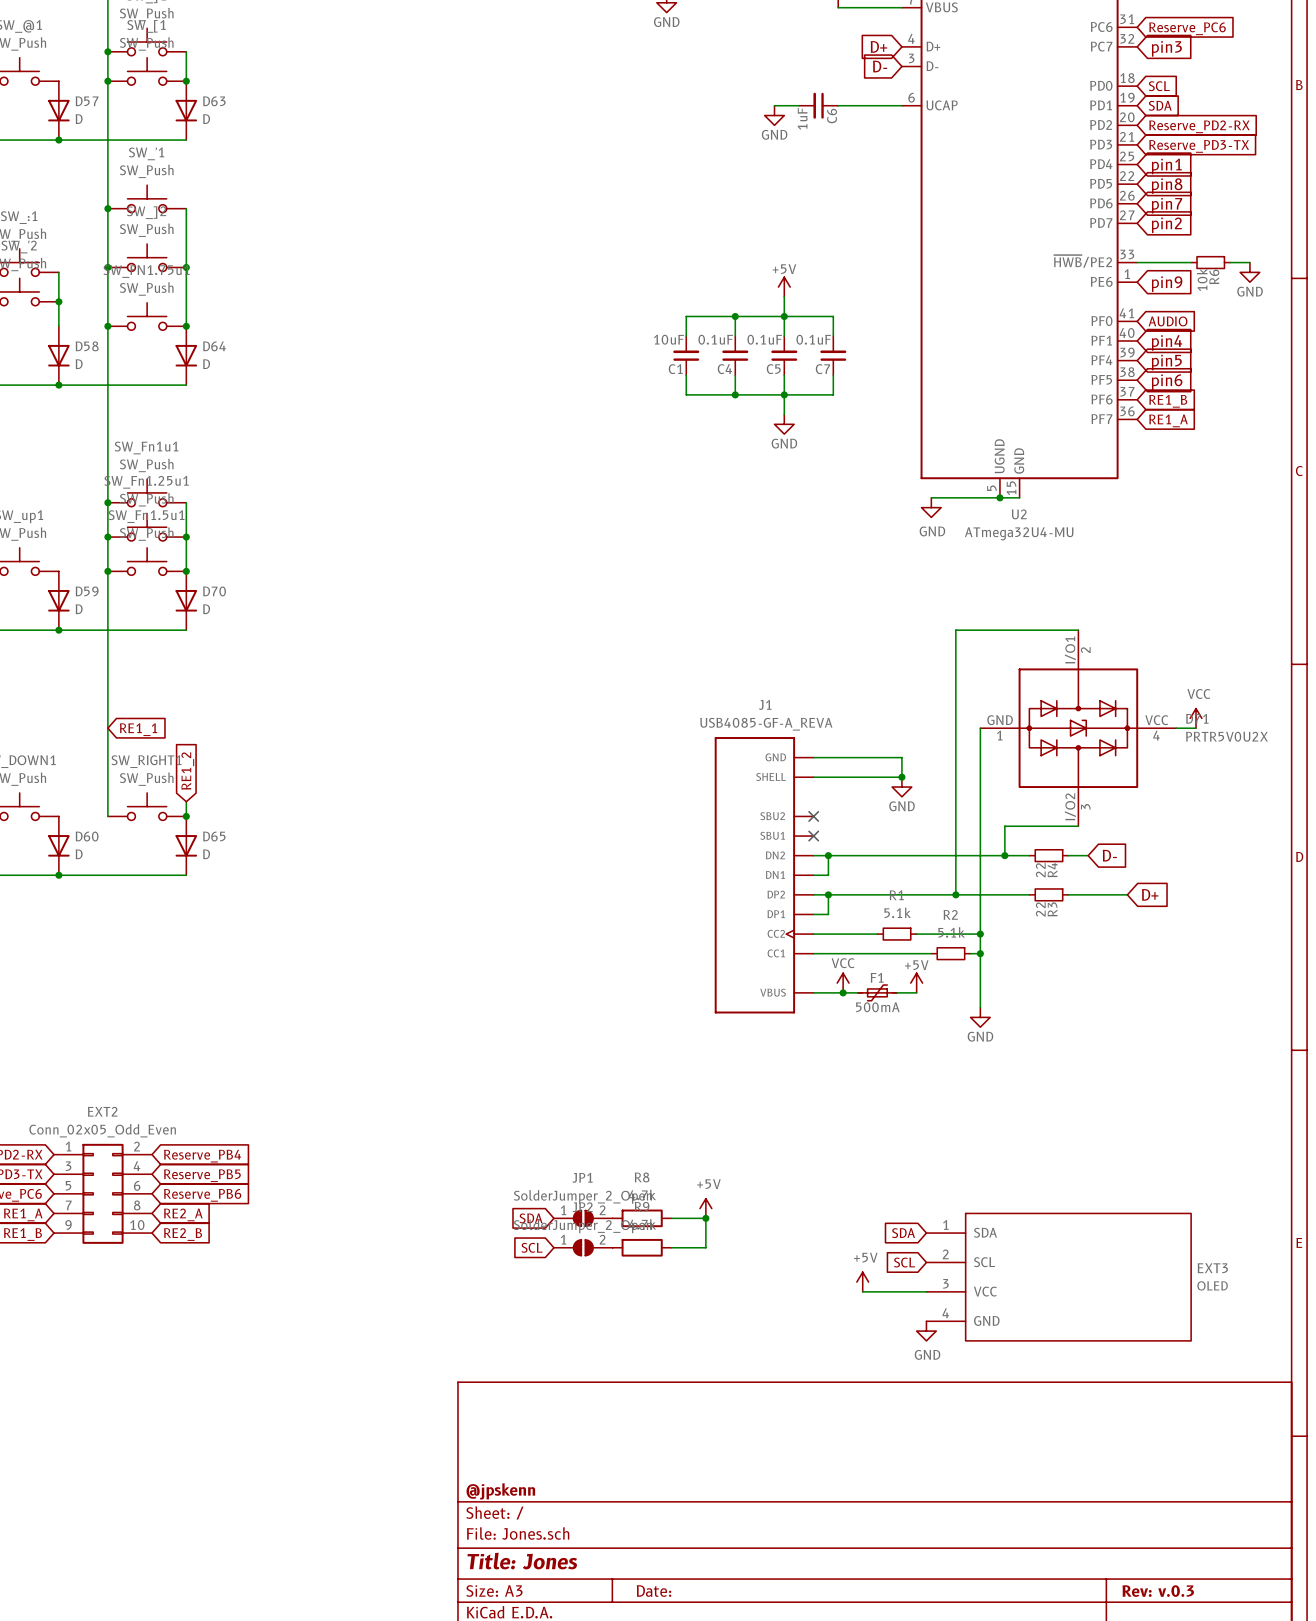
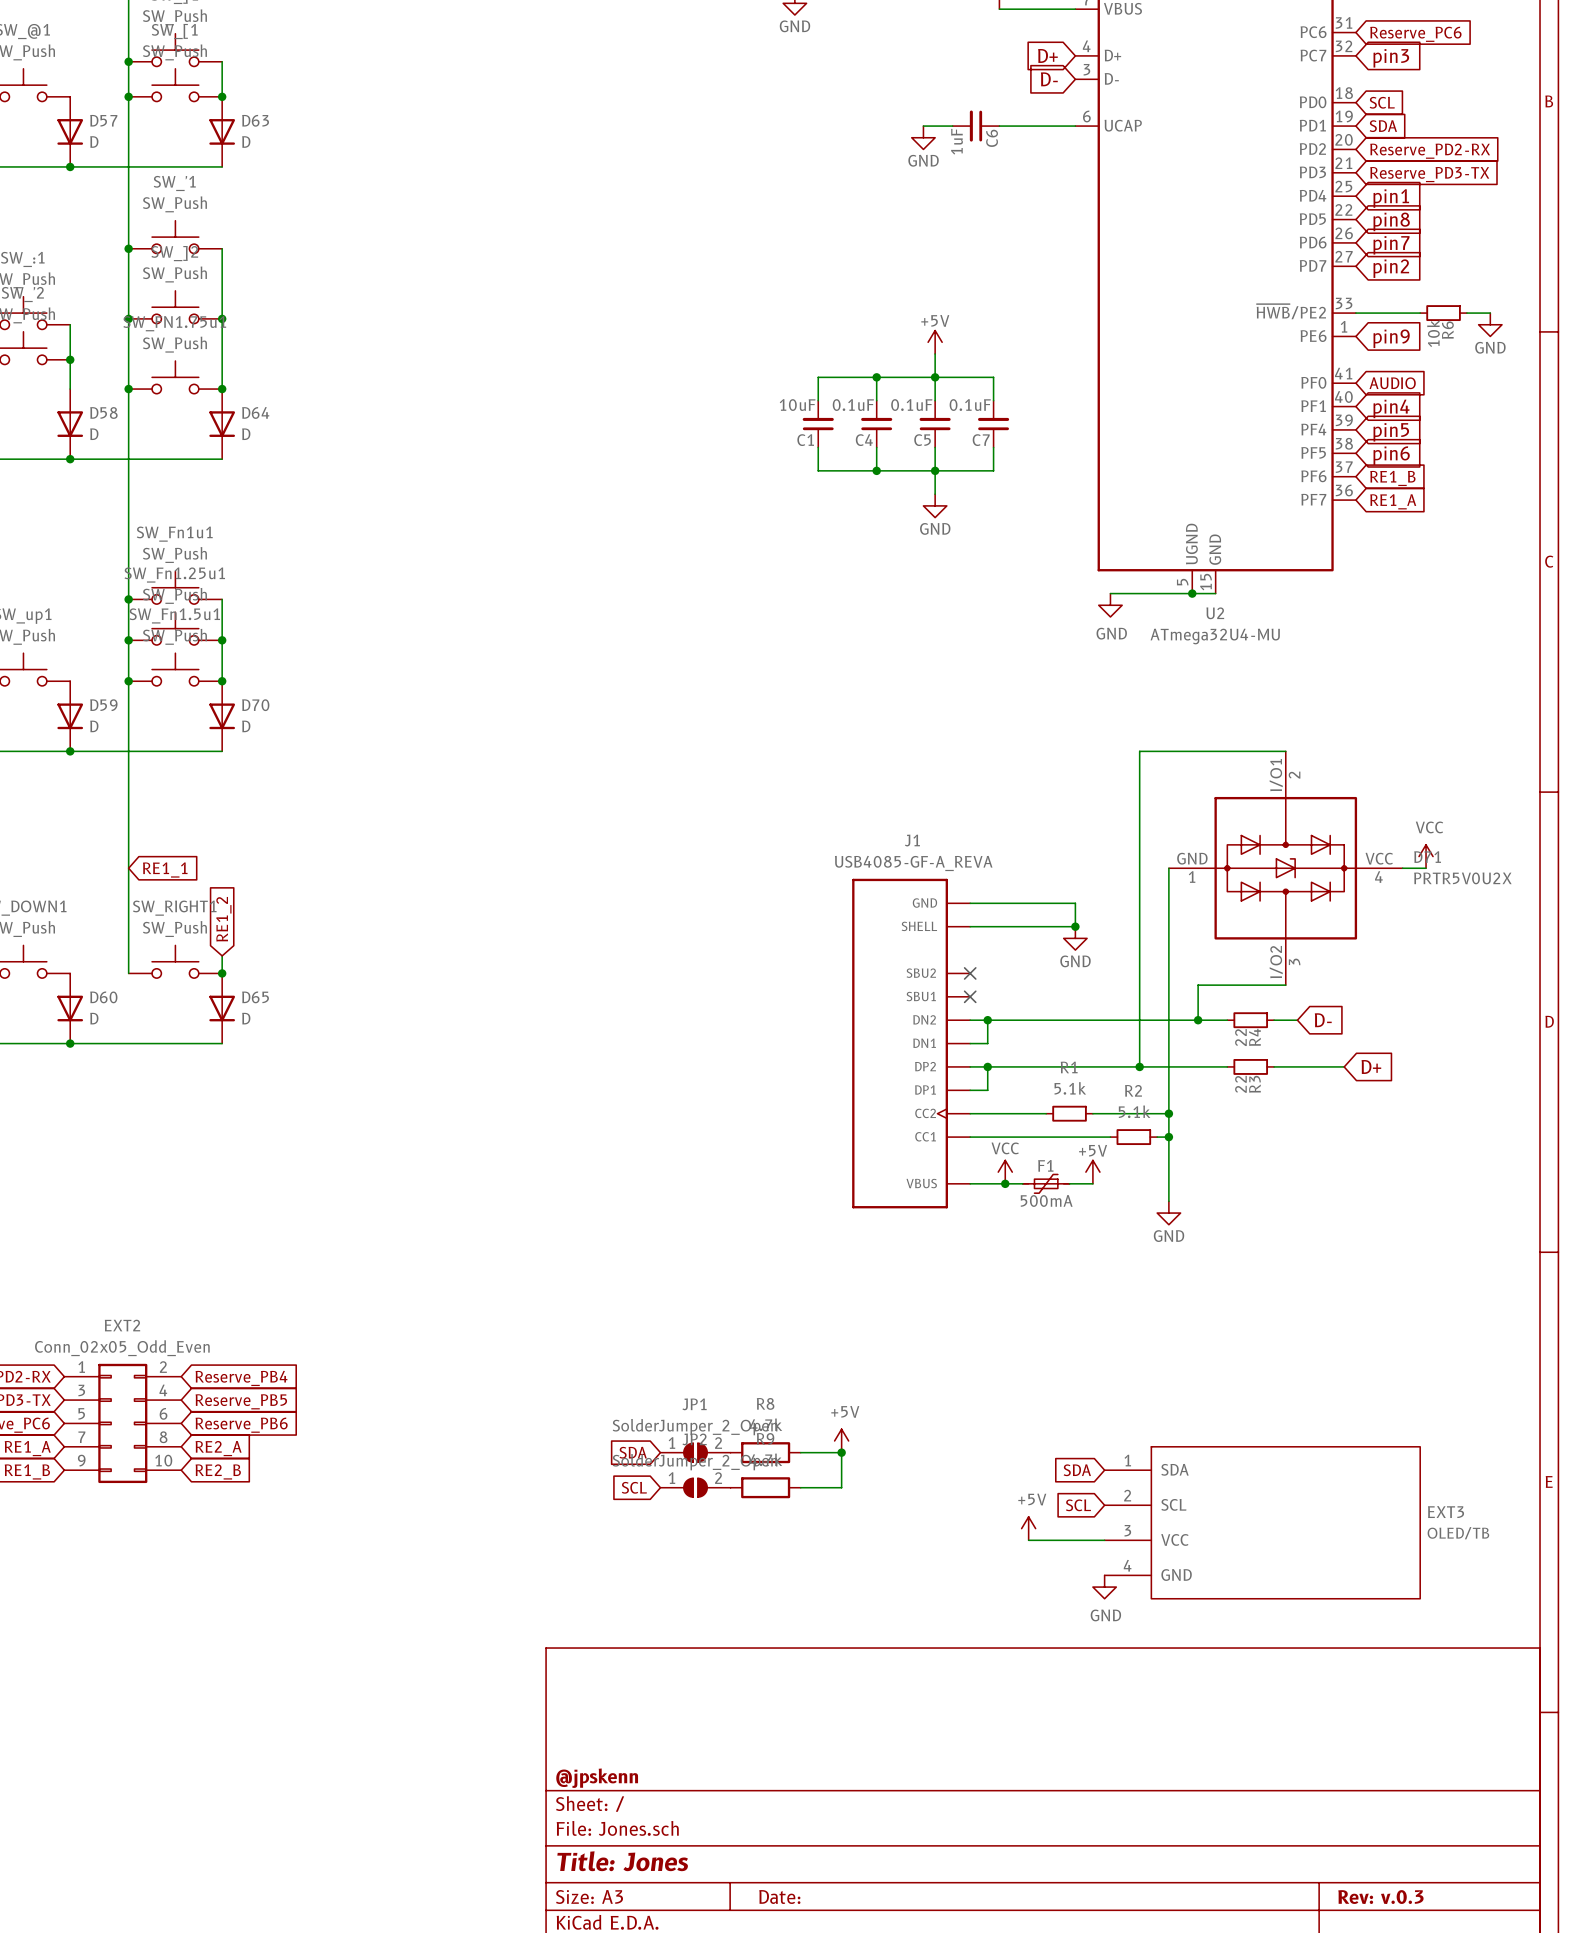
EXT3 value: OLED (1212, 1285) -> OLED/TB (1458, 1533)

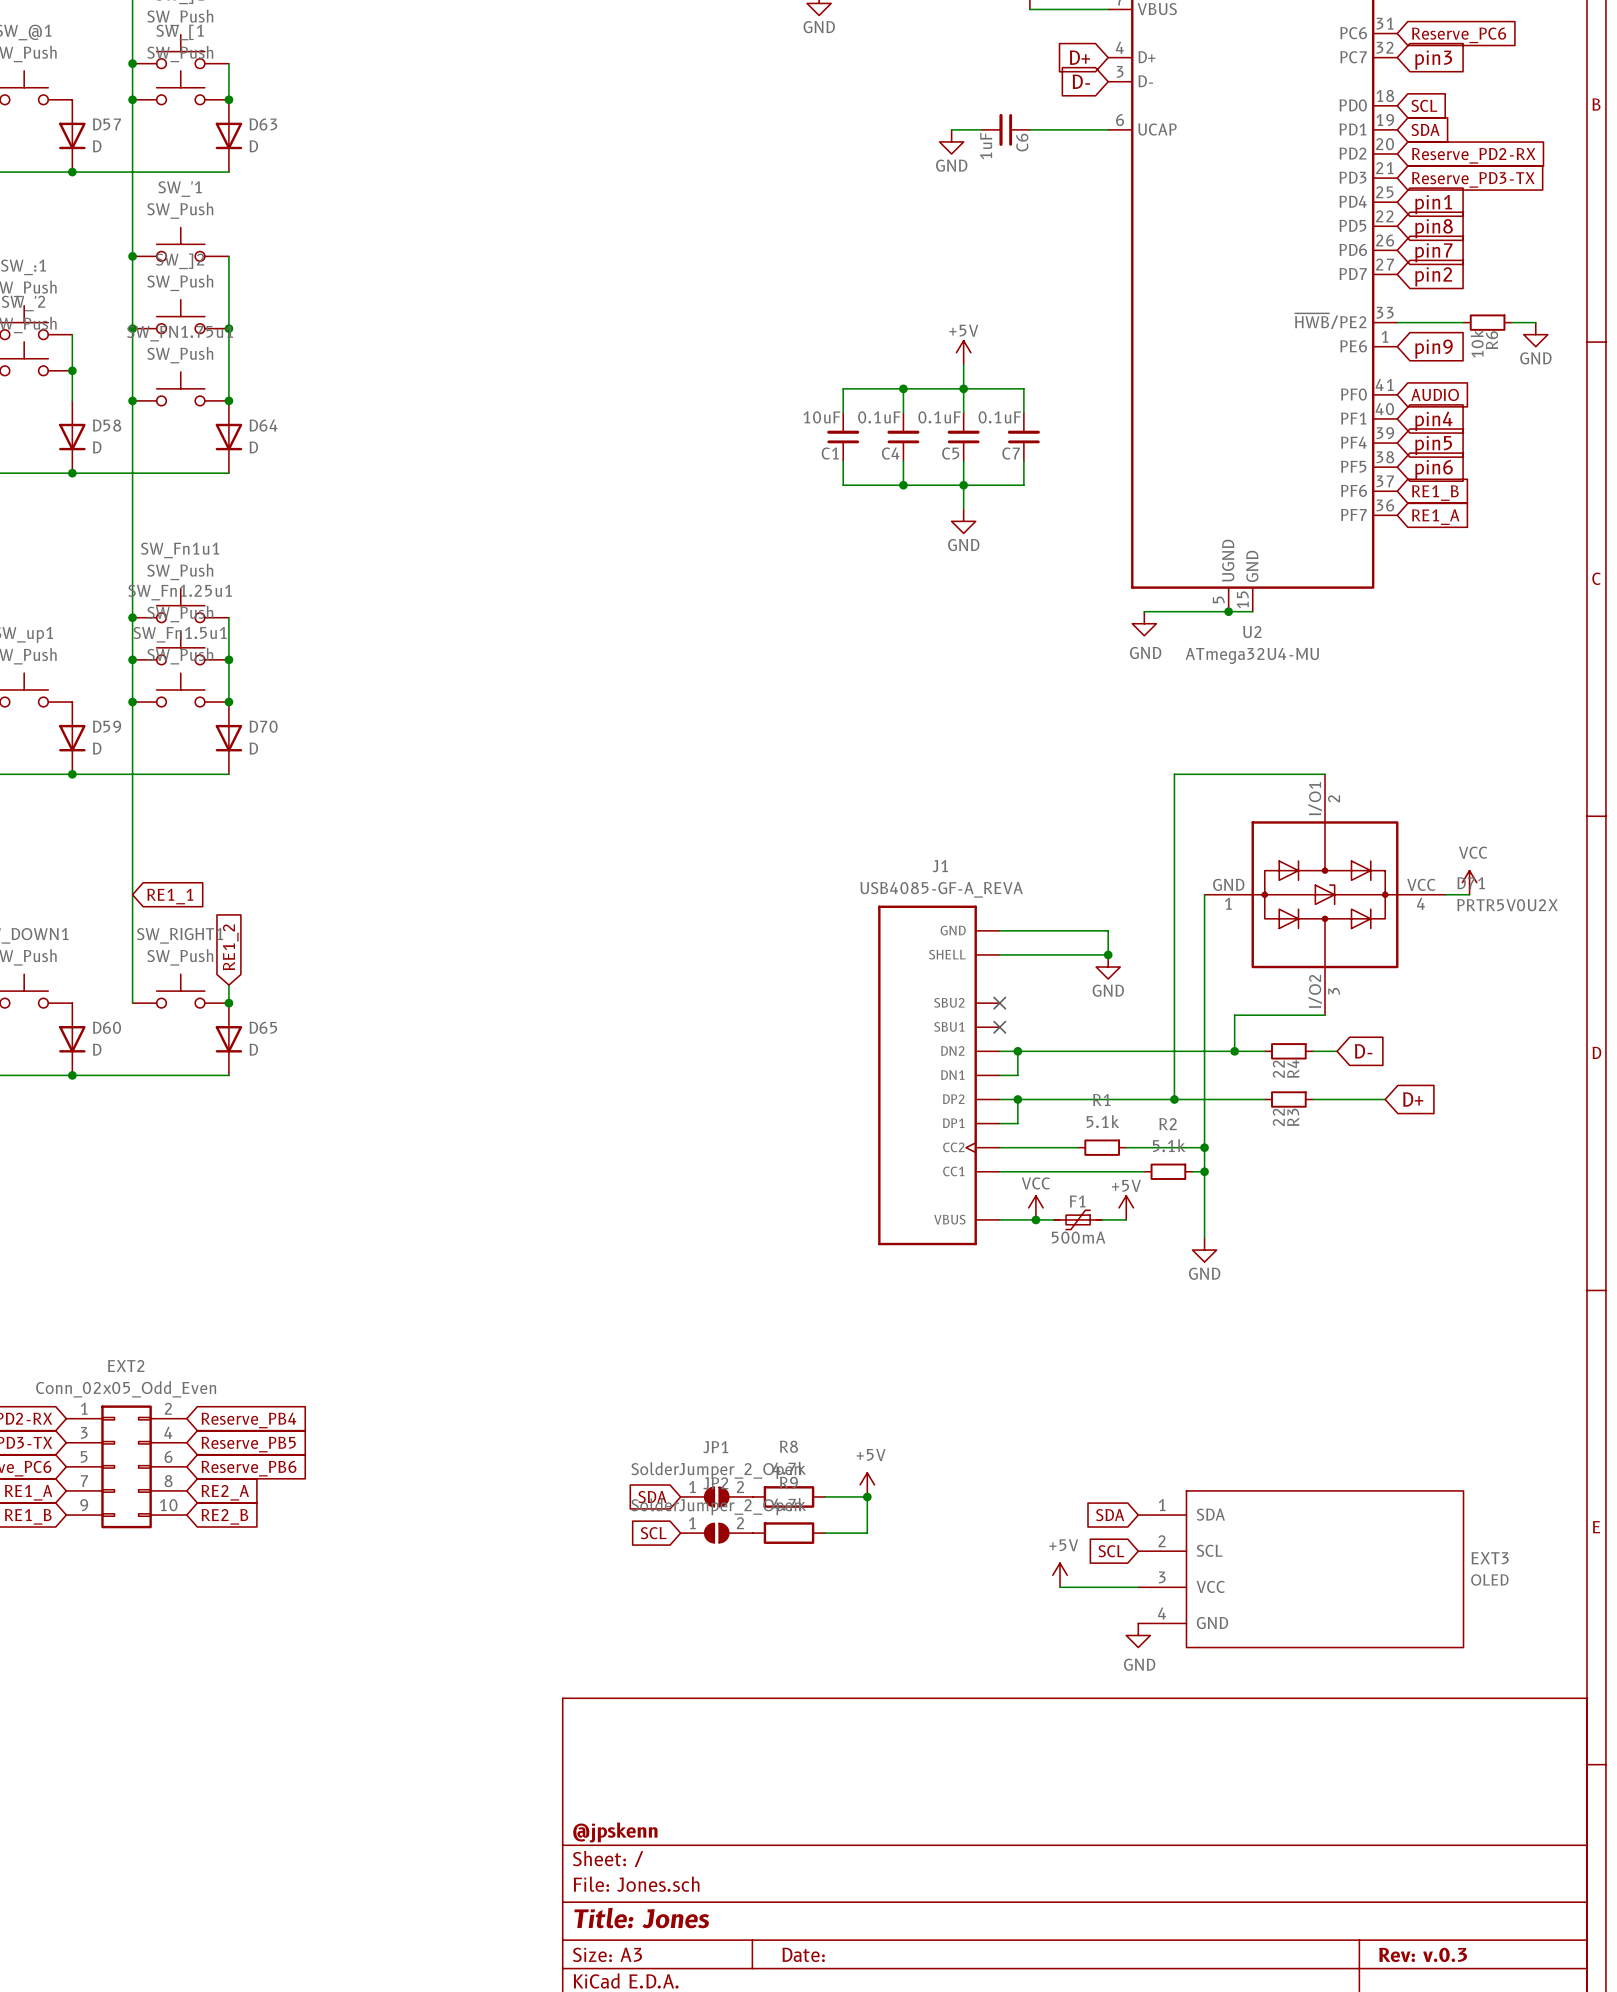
EXT3 value: OLED/TB (1458, 1533) -> OLED (1489, 1579)

